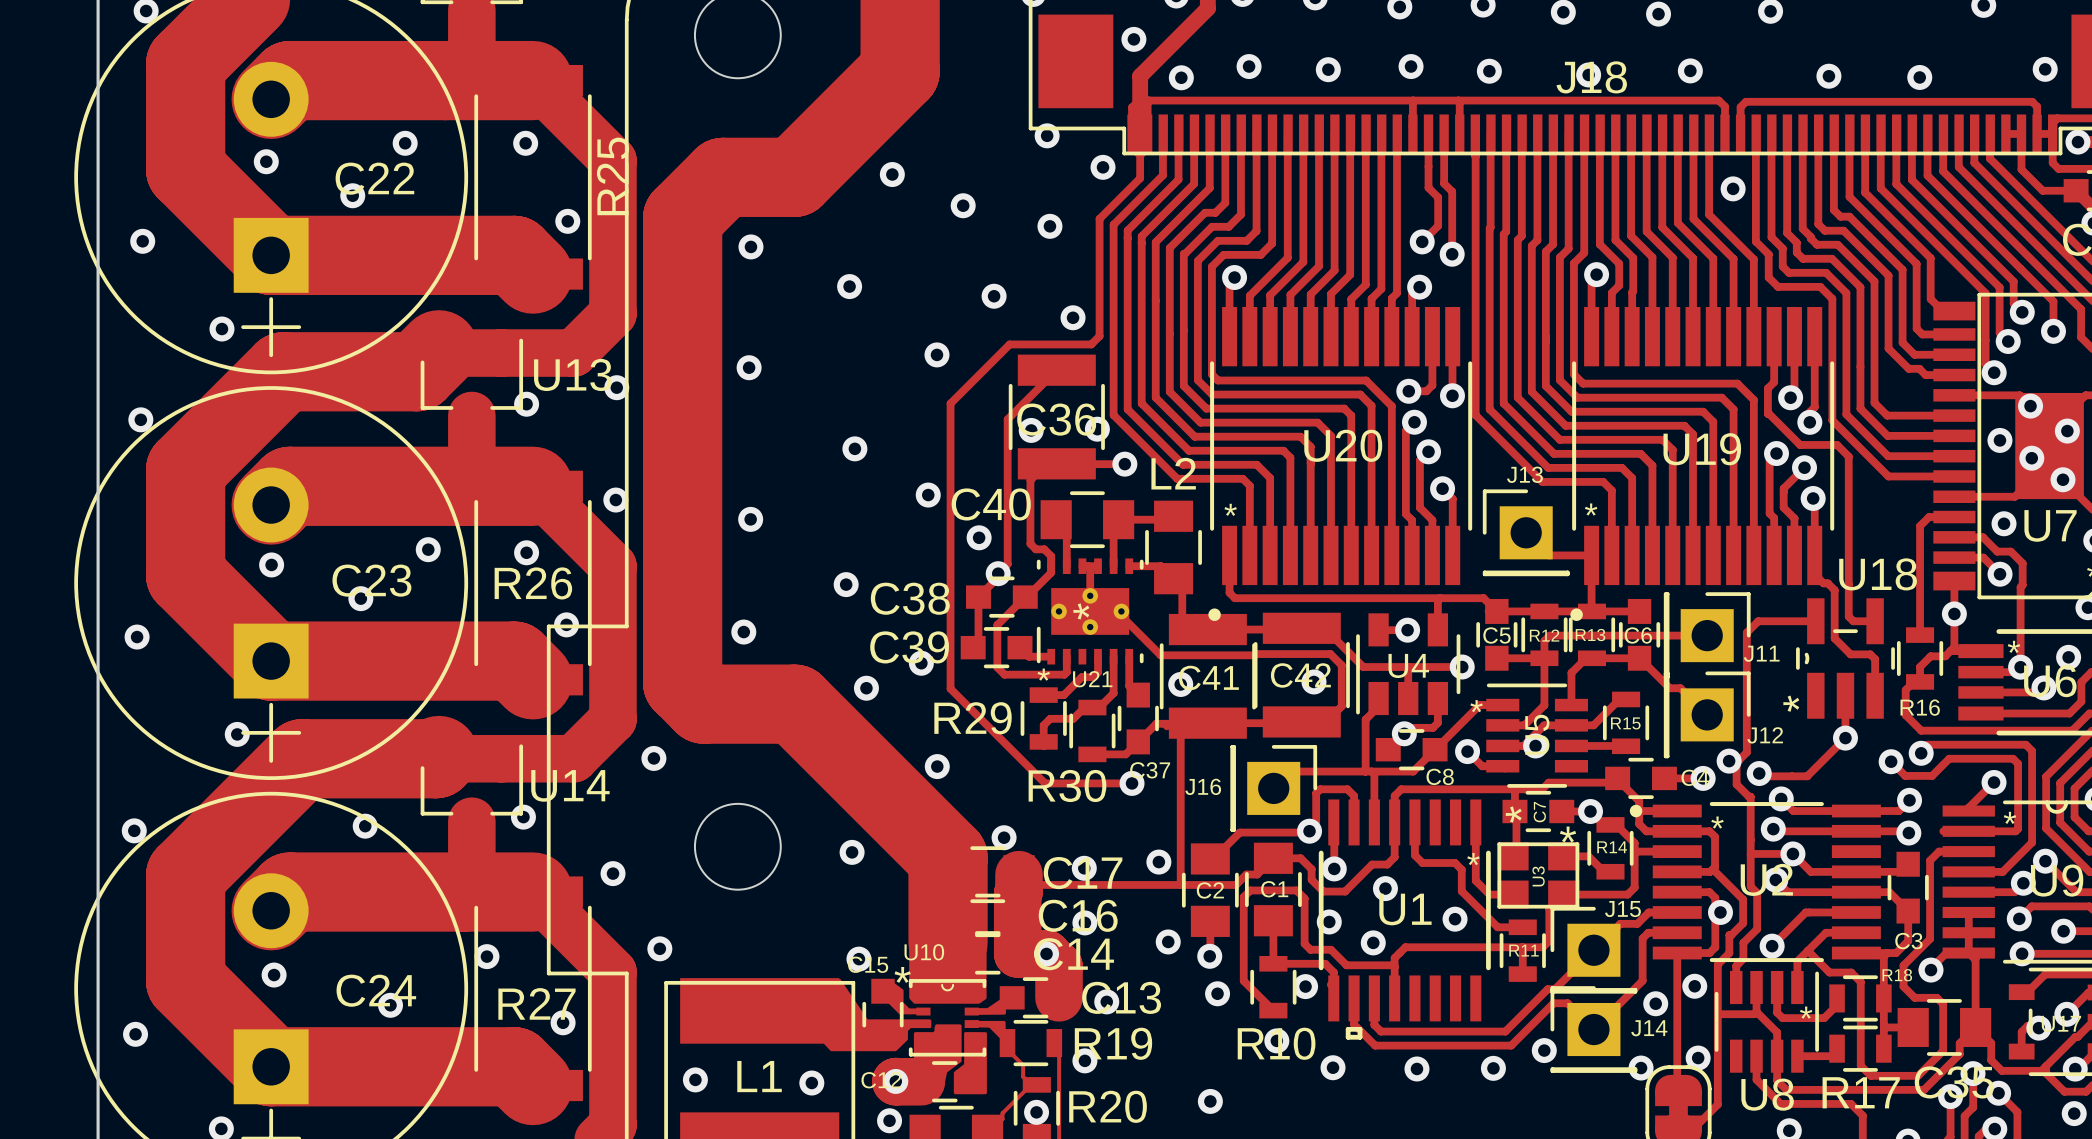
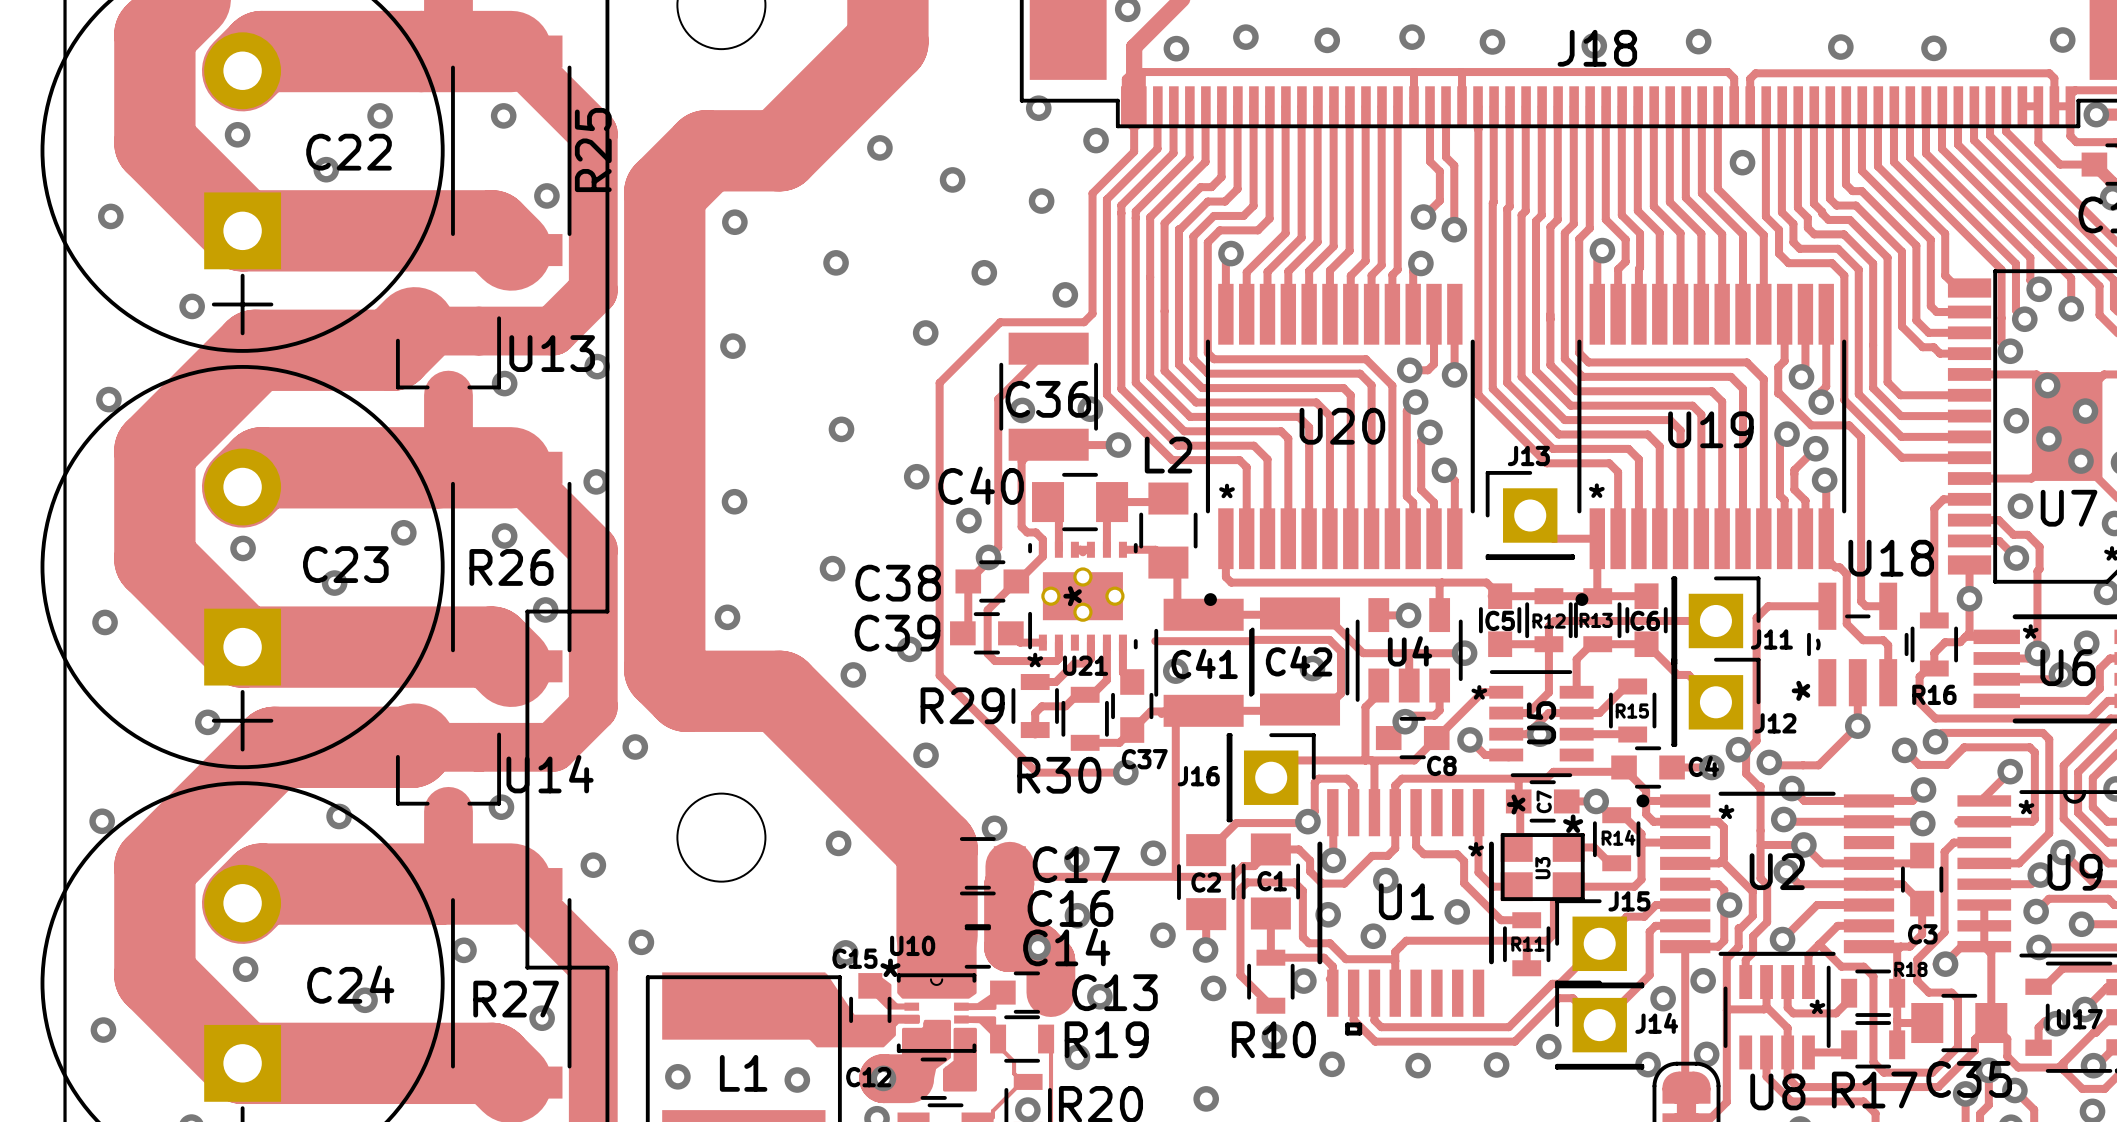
U21 footprint: [1036, 558, 1144, 665] -> [1028, 541, 1138, 651]
track: (1090, 568) (1090, 611) (1116, 611) (1160, 655) -> none

